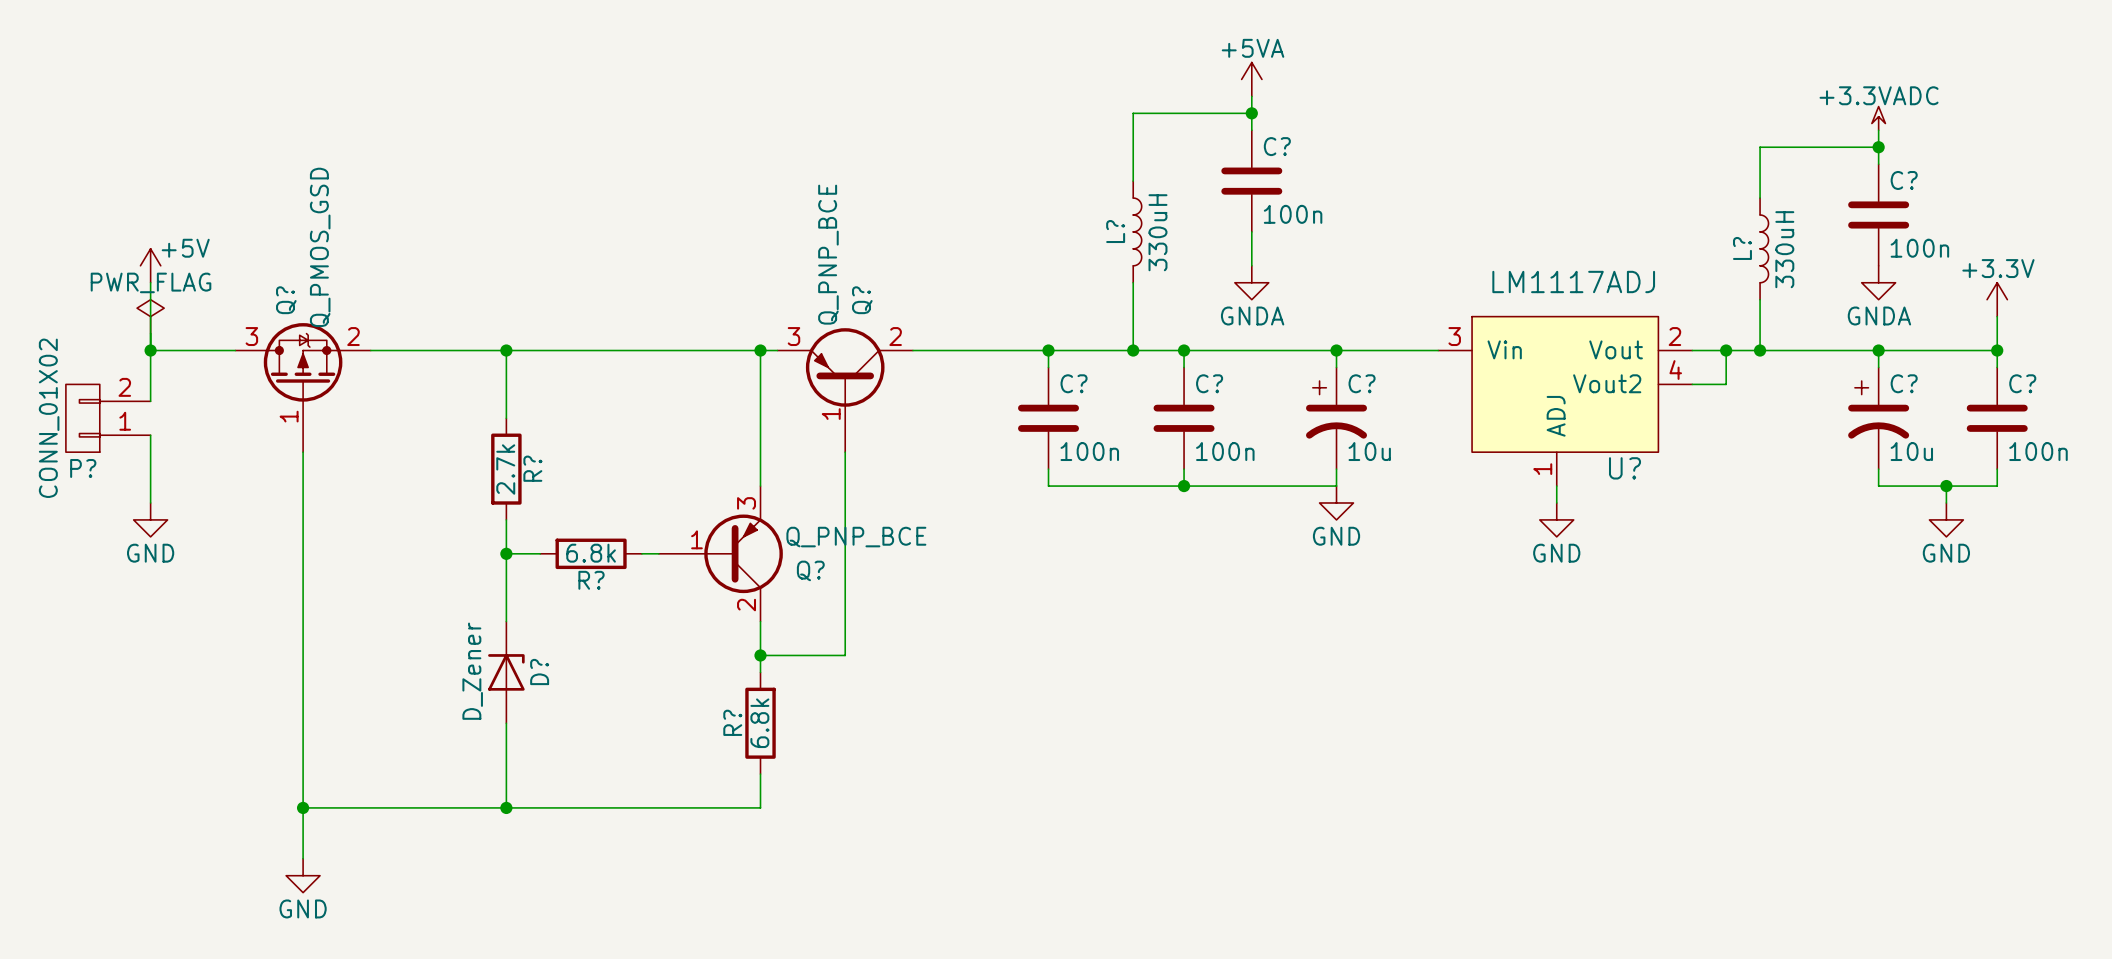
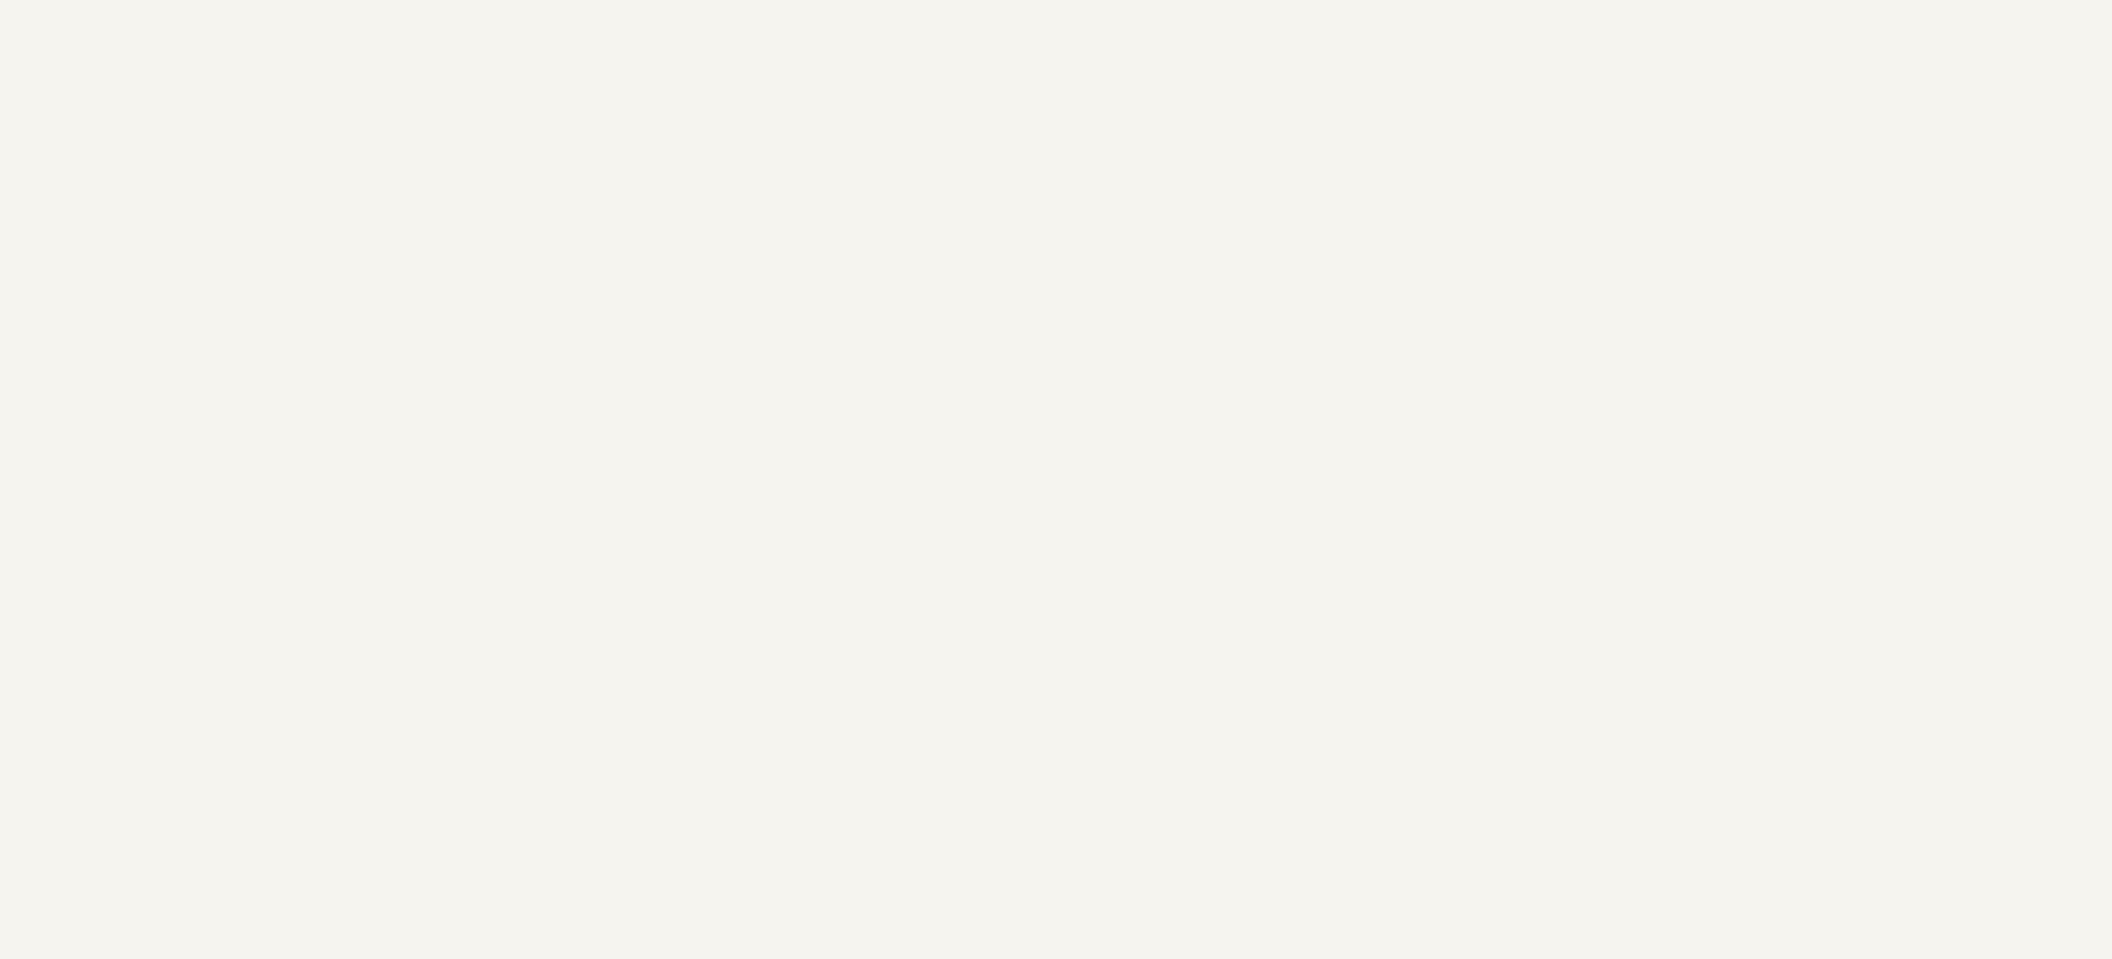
power symbol: +5VA (1251, 79) -> none
wire: (1251, 96) (1251, 130) -> none
wire: (1251, 113) (1133, 113) (1133, 181) -> none
junction: (1251, 113) -> none
power symbol: +3.3VADC (1878, 118) -> none
wire: (1878, 130) (1878, 164) -> none
wire: (1878, 147) (1760, 147) (1760, 198) -> none
junction: (1878, 147) -> none
C?: 100n (1251, 181) -> none
C?: 100n (1878, 214) -> none
L?: 330uH (1137, 231) -> none
wire: (1251, 231) (1251, 265) -> none
L?: 330uH (1764, 248) -> none
power symbol: +5V (150, 265) -> none
wire: (150, 282) (150, 401) -> none
wire: (1133, 282) (1133, 350) -> none
power symbol: GNDA (1251, 282) -> none
power symbol: GNDA (1878, 282) -> none
wire: (1760, 299) (1760, 350) -> none
power symbol: +3.3V (1997, 299) -> none
power symbol: PWR_FLAG (150, 316) -> none
wire: (1997, 316) (1997, 367) -> none
wire: (150, 350) (235, 350) -> none
junction: (150, 350) -> none
wire: (370, 350) (777, 350) -> none
wire: (506, 350) (506, 418) -> none
junction: (506, 350) -> none
wire: (760, 350) (760, 486) -> none
junction: (760, 350) -> none
wire: (912, 350) (1438, 350) -> none
wire: (1048, 350) (1048, 367) -> none
junction: (1048, 350) -> none
junction: (1133, 350) -> none
wire: (1184, 350) (1184, 367) -> none
junction: (1184, 350) -> none
wire: (1336, 350) (1336, 367) -> none
junction: (1336, 350) -> none
wire: (1692, 350) (1997, 350) -> none
wire: (1726, 350) (1726, 384) (1692, 384) -> none
junction: (1726, 350) -> none
junction: (1760, 350) -> none
wire: (1878, 350) (1878, 367) -> none
junction: (1878, 350) -> none
junction: (1997, 350) -> none
Q?: Q_PMOS_GSD (303, 387) -> none
Q?: Q_PNP_BCE (845, 390) -> none
U?: LM1117ADJ (1565, 401) -> none
P?: CONN_01X02 (108, 418) -> none
C?: 100n (1048, 418) -> none
C?: 100n (1184, 418) -> none
C?: 10u (1336, 418) -> none
C?: 10u (1878, 418) -> none
C?: 100n (1997, 418) -> none
wire: (150, 435) (150, 502) -> none
wire: (303, 452) (303, 858) -> none
wire: (845, 452) (845, 655) (760, 655) -> none
R?: 2.7k (506, 469) -> none
wire: (1048, 469) (1048, 486) (1336, 486) (1336, 469) -> none
wire: (1184, 469) (1184, 486) -> none
wire: (1878, 469) (1878, 486) (1997, 486) (1997, 469) -> none
junction: (1184, 486) -> none
wire: (1556, 486) (1556, 502) -> none
wire: (1946, 486) (1946, 502) -> none
junction: (1946, 486) -> none
power symbol: GND (1336, 502) -> none
power symbol: GND (150, 519) -> none
wire: (506, 519) (506, 621) -> none
power symbol: GND (1556, 519) -> none
power symbol: GND (1946, 519) -> none
wire: (506, 553) (540, 553) -> none
junction: (506, 553) -> none
R?: 6.8k (591, 553) -> none
wire: (641, 553) (658, 553) -> none
Q?: Q_PNP_BCE (720, 553) -> none
wire: (760, 621) (760, 672) -> none
junction: (760, 655) -> none
D?: D_Zener (506, 672) -> none
wire: (506, 723) (506, 807) -> none
R?: 6.8k (760, 723) -> none
wire: (760, 774) (760, 807) (303, 807) -> none
junction: (303, 807) -> none
junction: (506, 807) -> none
power symbol: GND (303, 875) -> none

